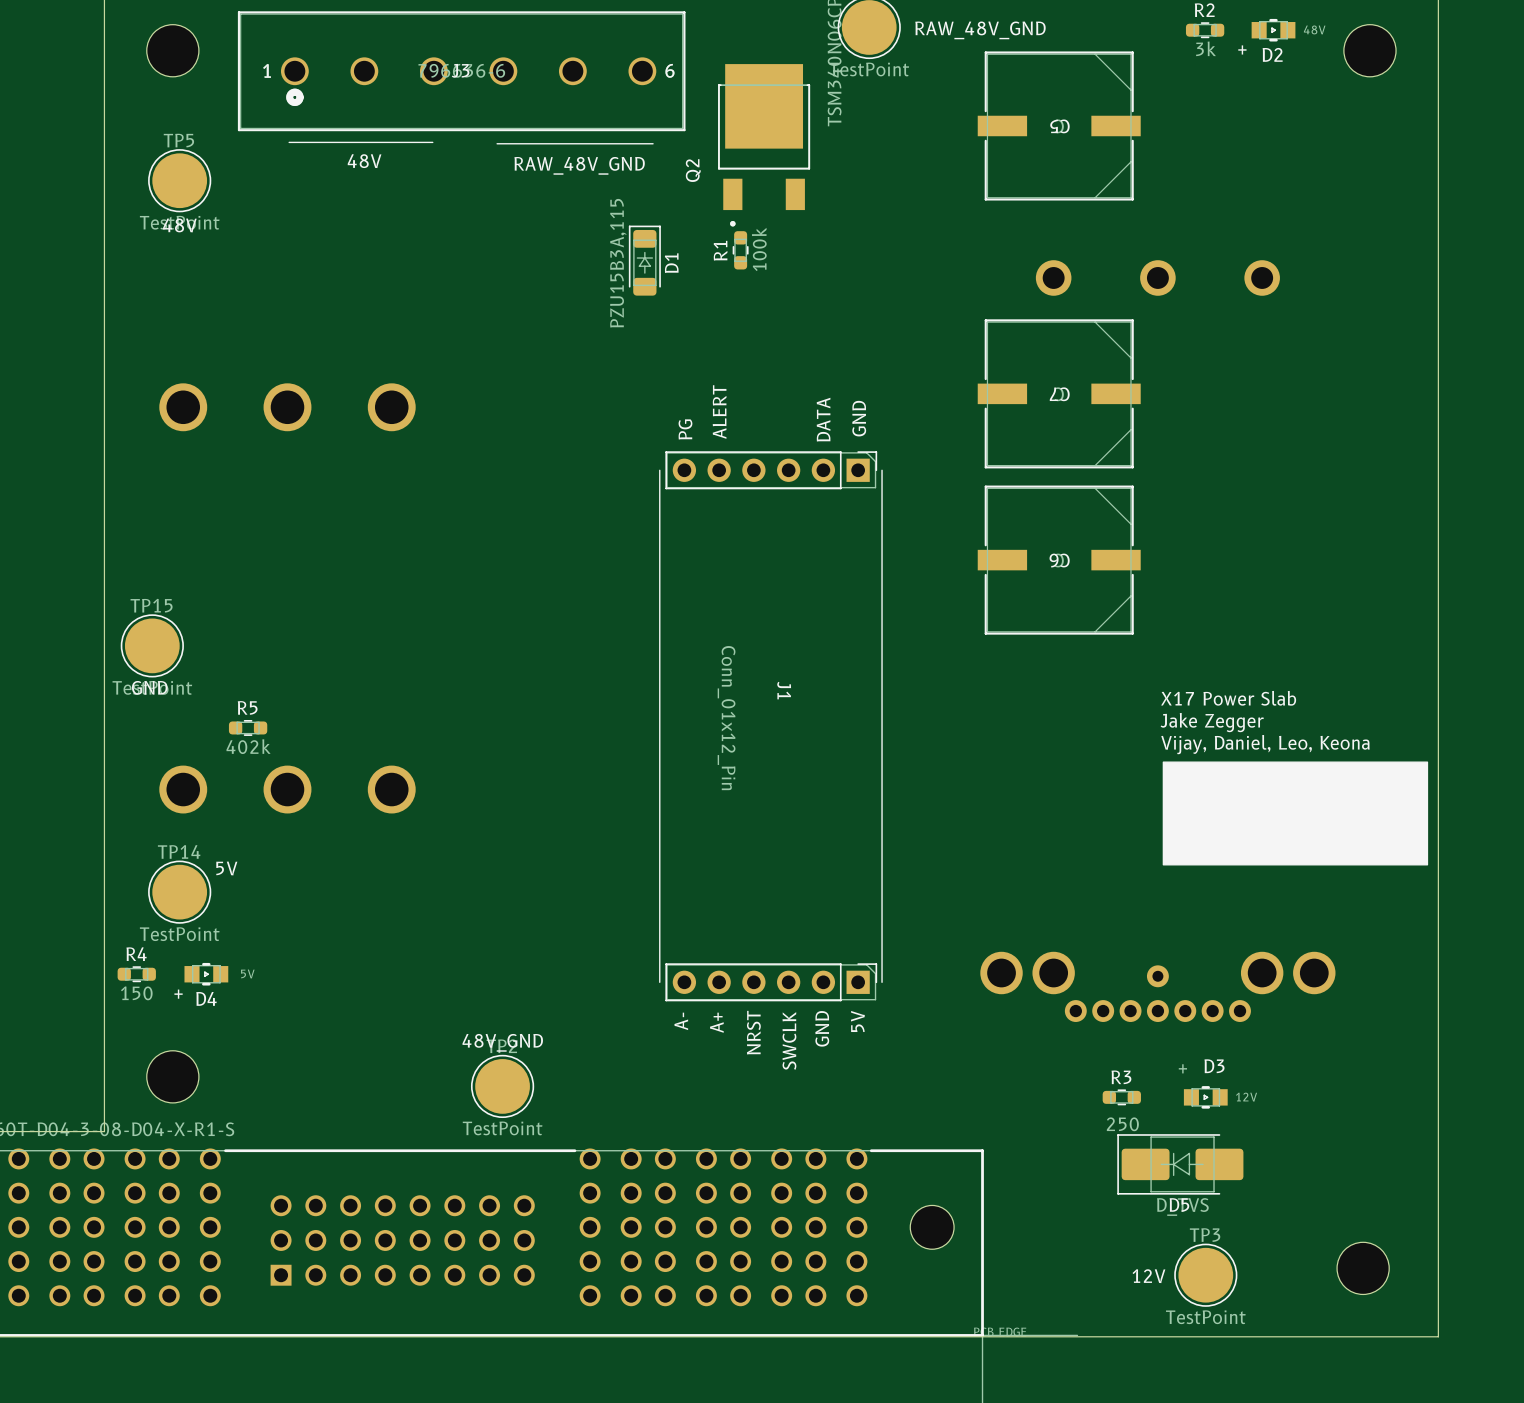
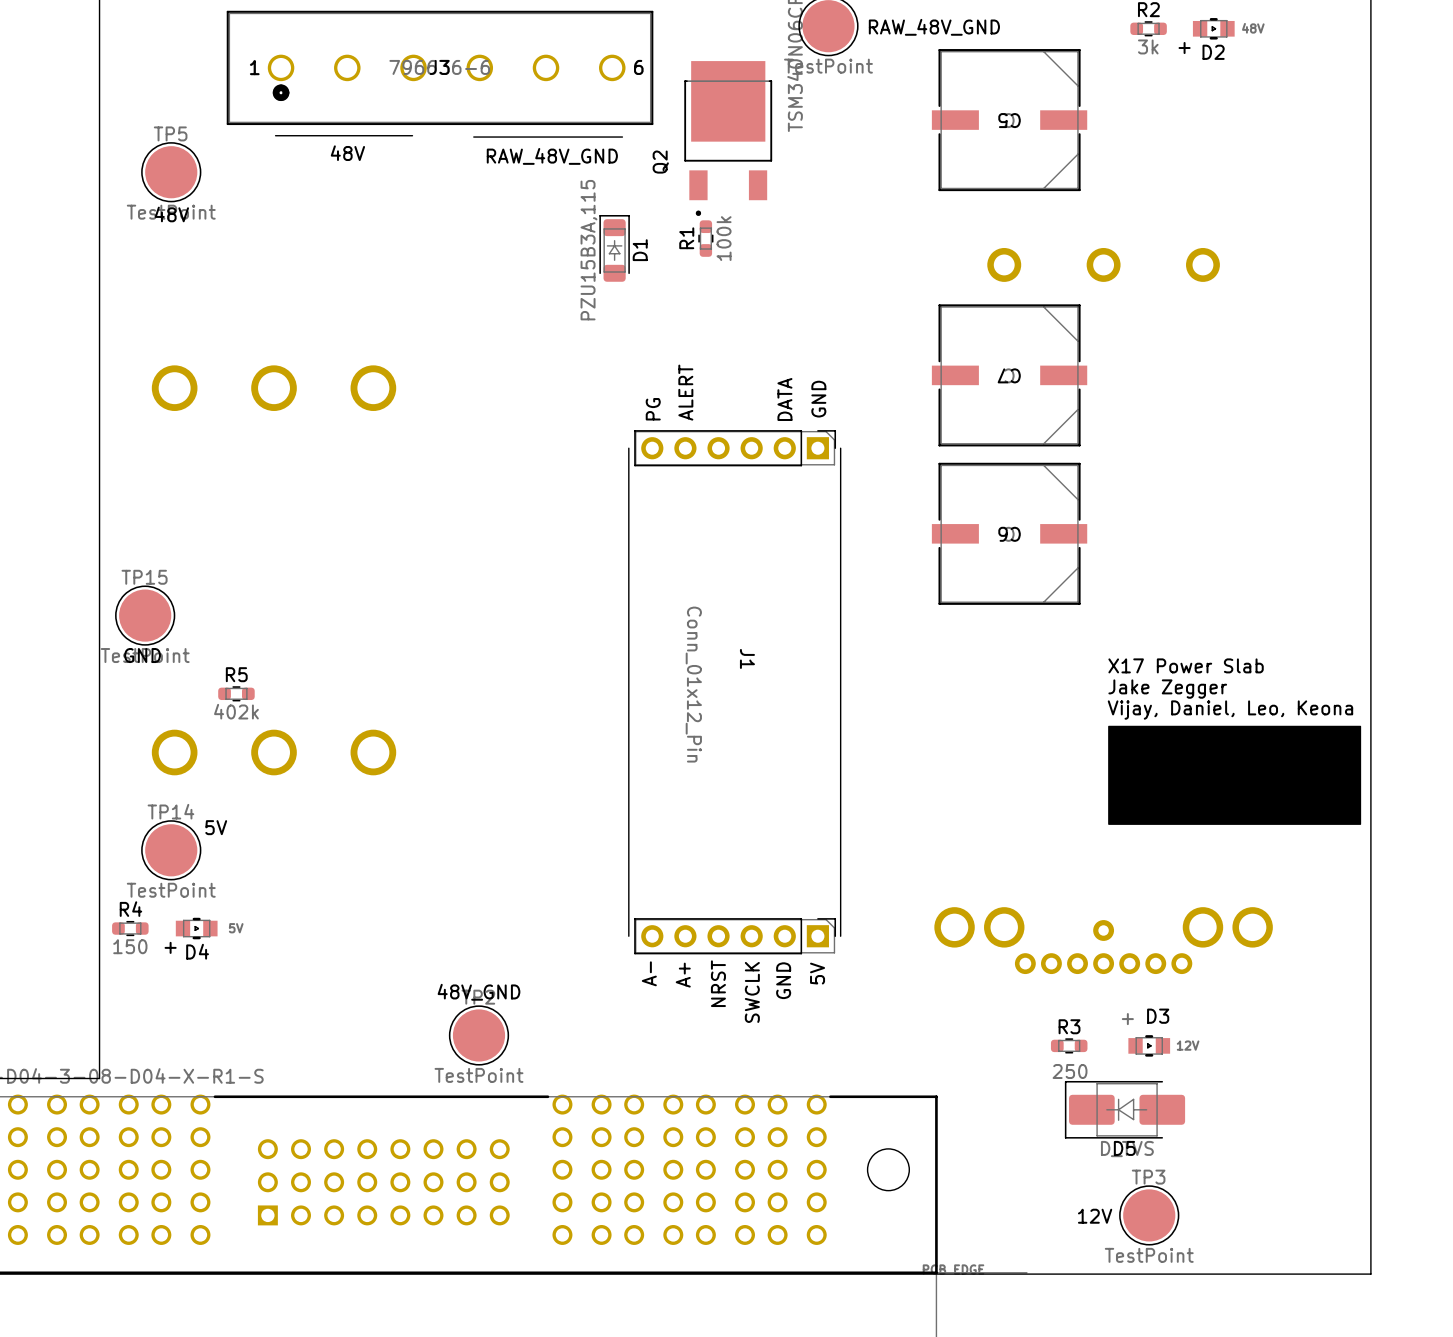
part: (172, 50) -> none
part: (1369, 50) -> none
part: (172, 1076) -> none
part: (1363, 1268) -> none

